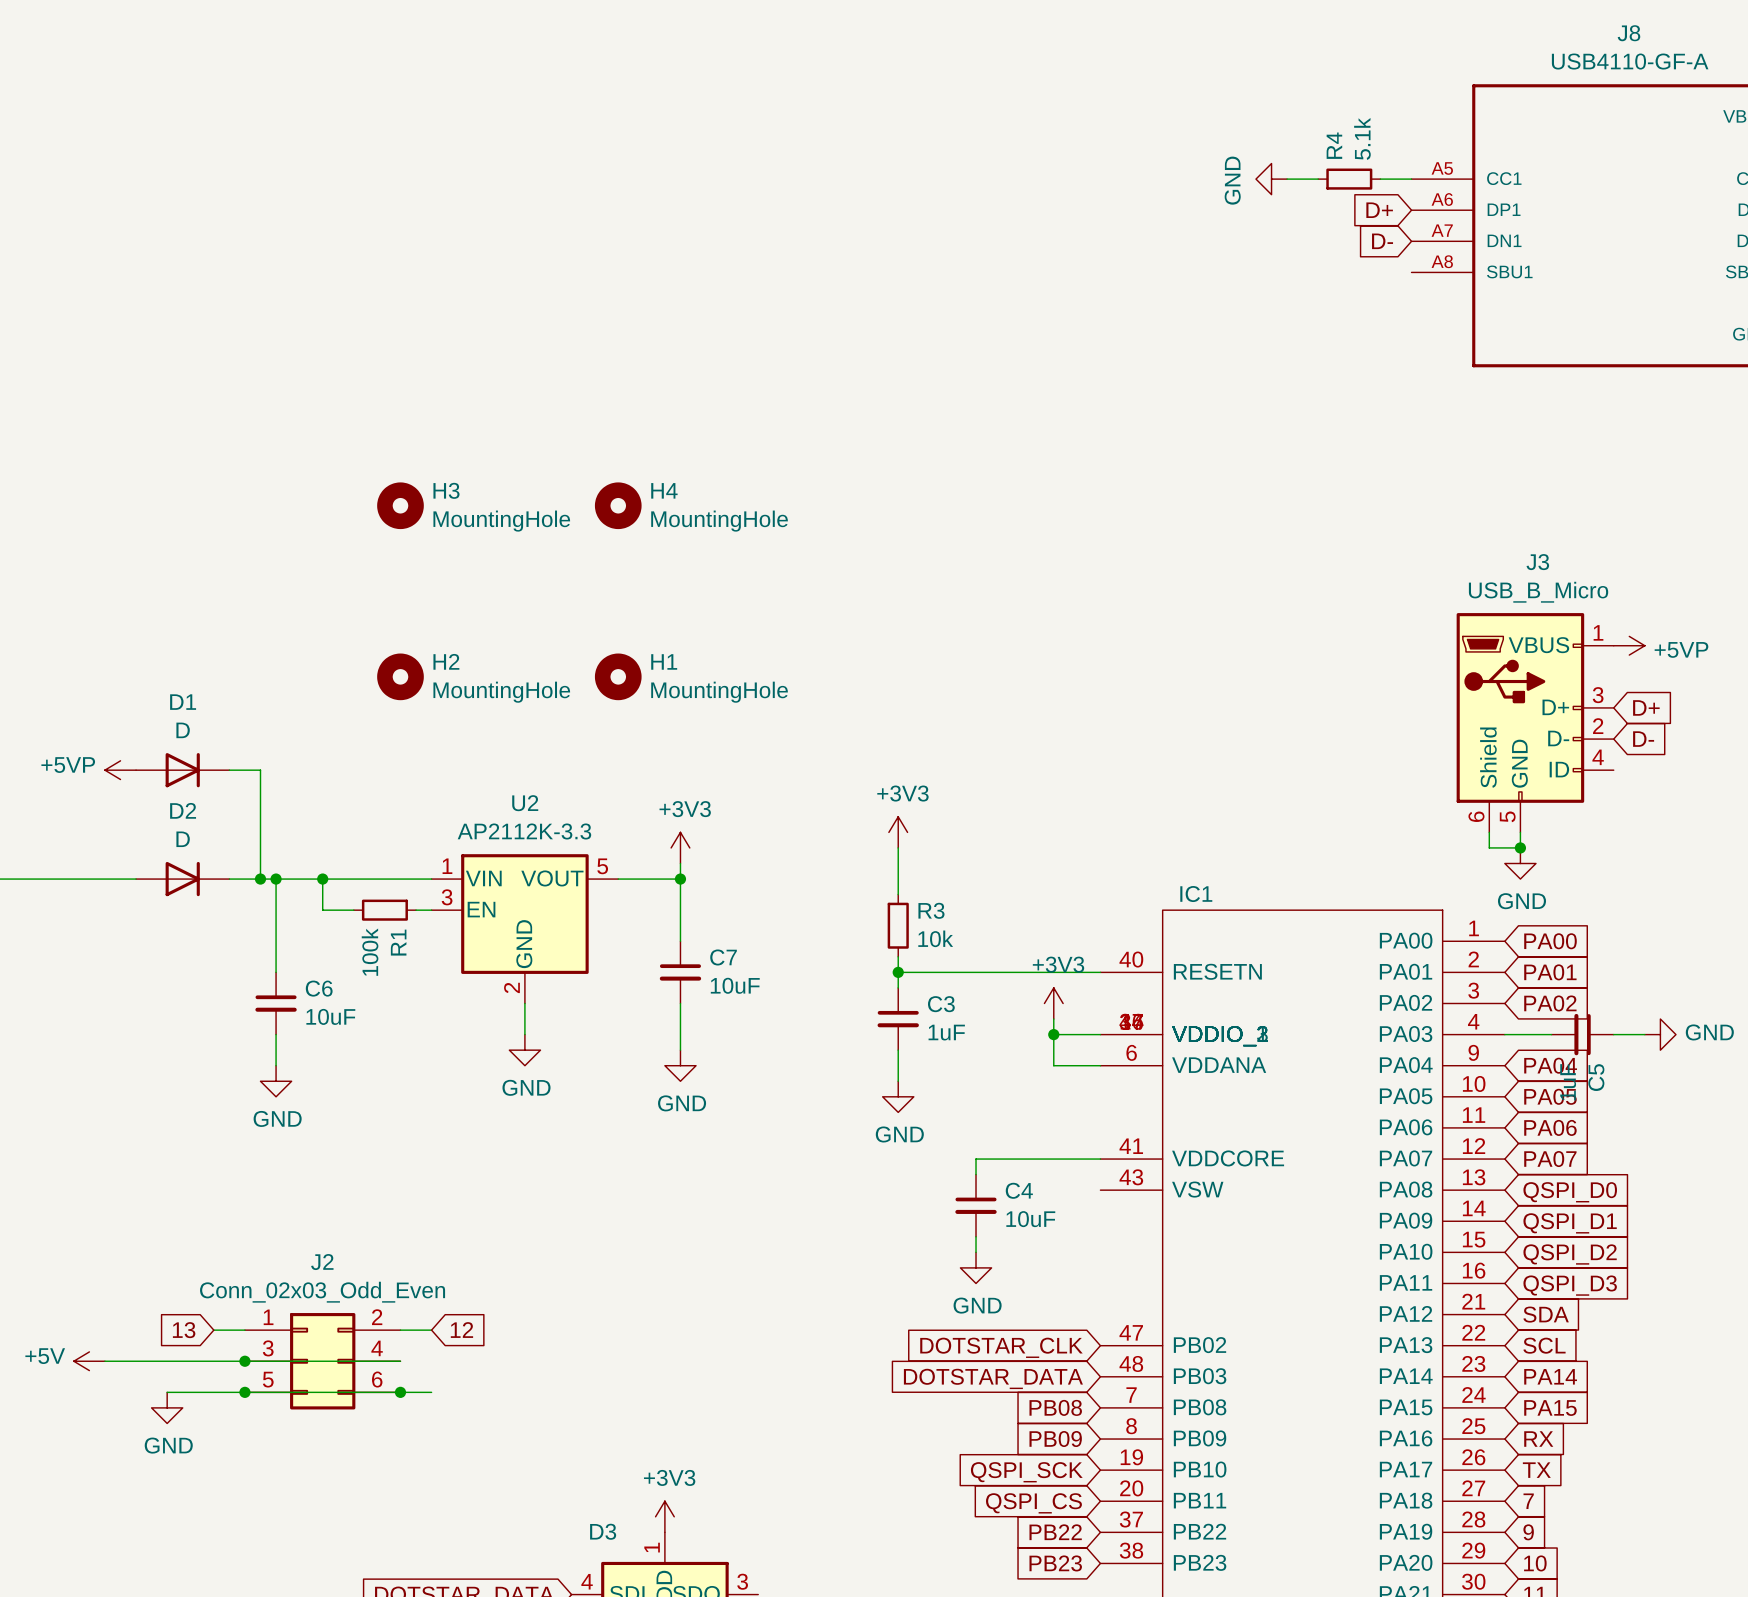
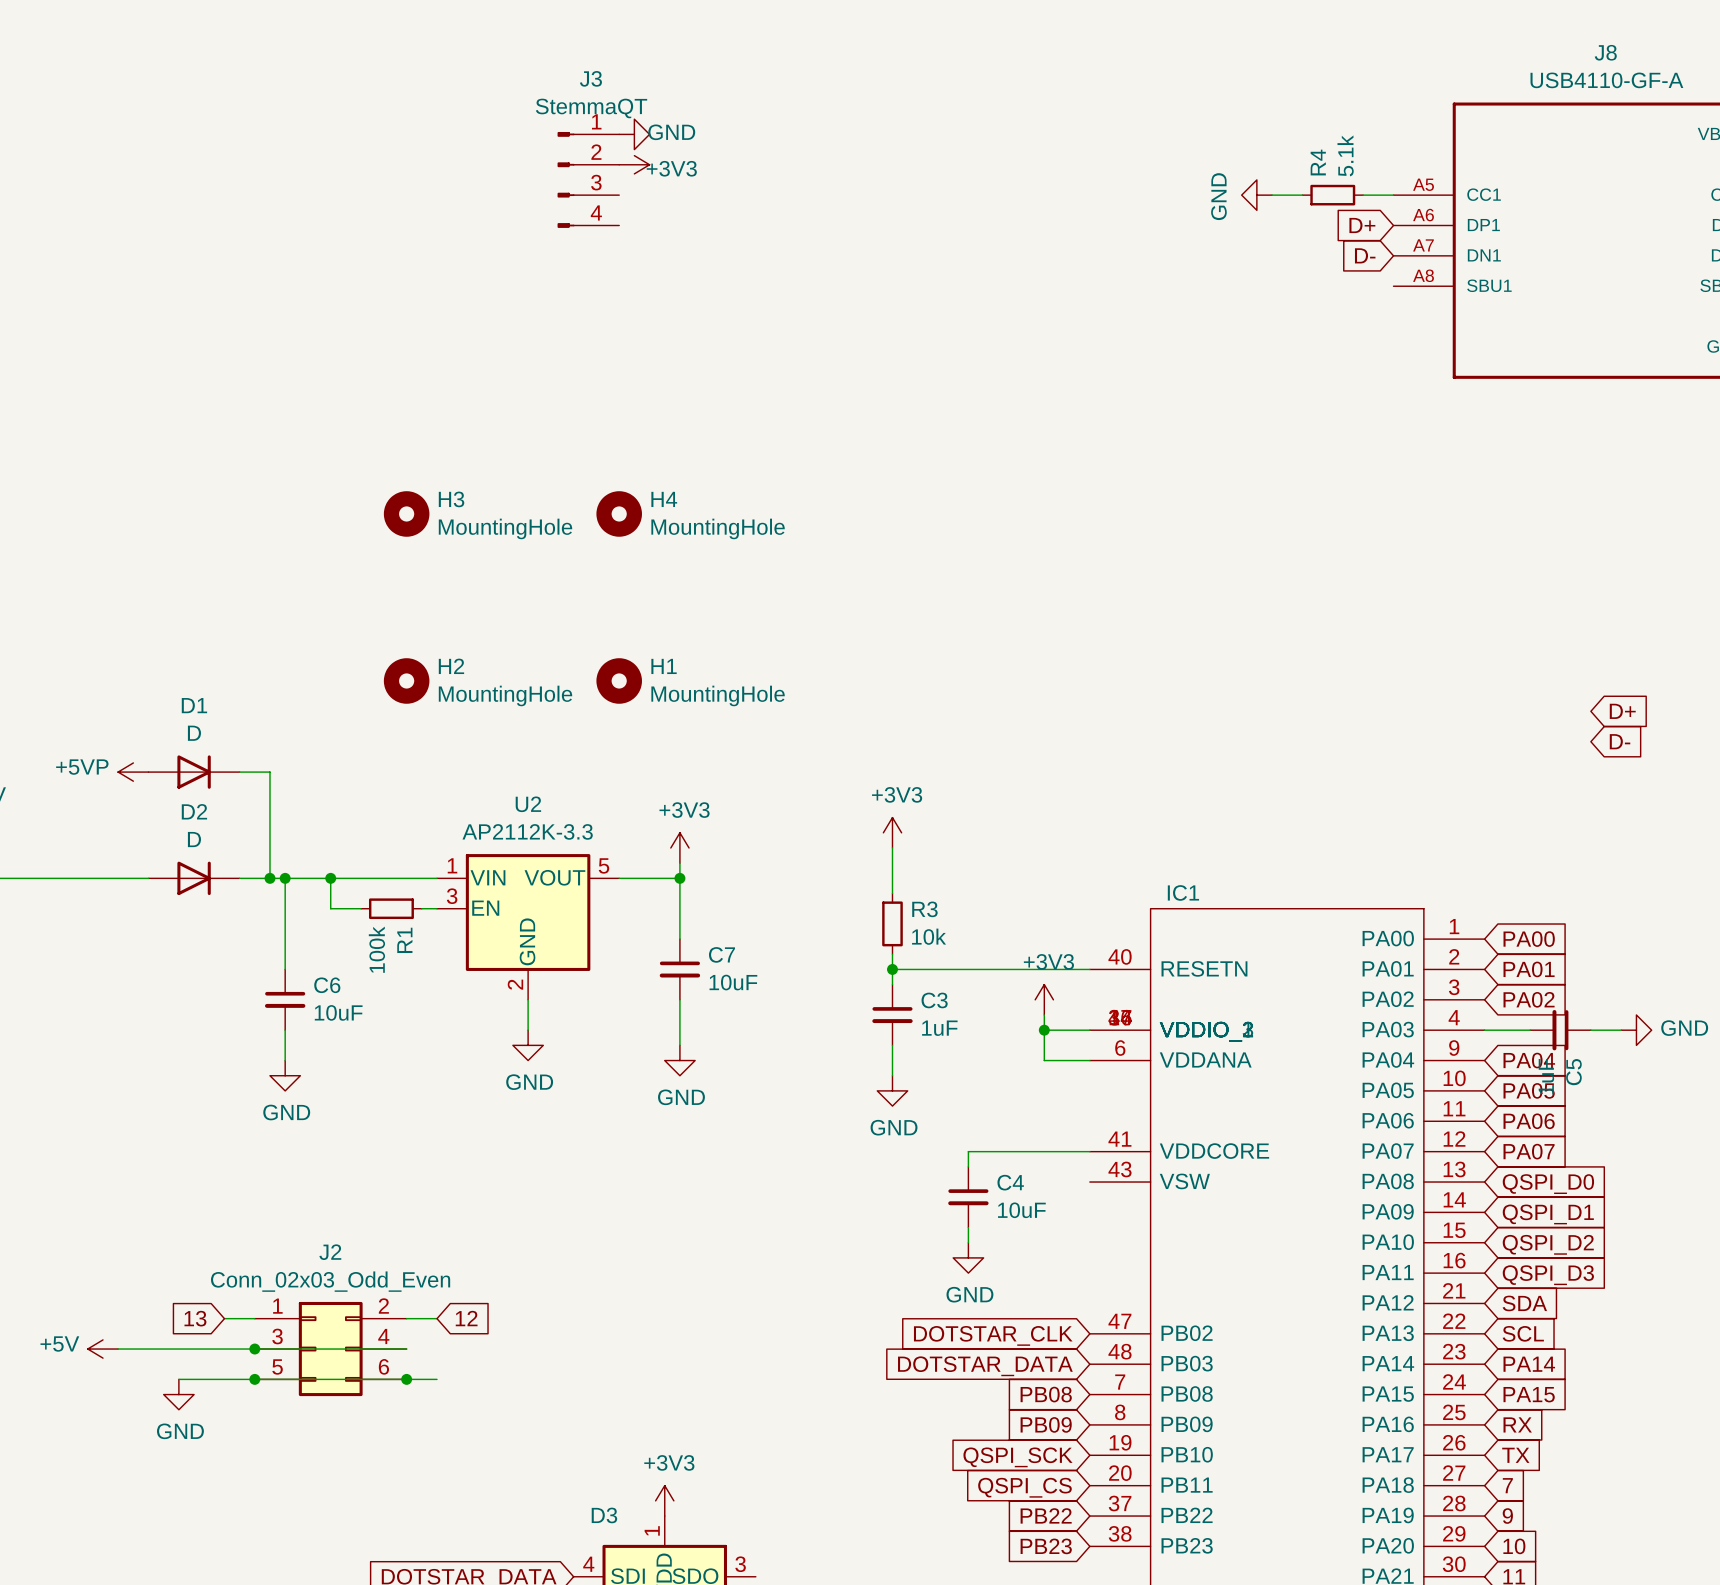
power symbol: none -> GND (634, 134)
power symbol: none -> +3V3 (634, 164)
J3 name position: J3 (1537, 562) -> J3 (590, 78)
J3 value: USB_B_Micro (1538, 592) -> StemmaQT (591, 108)
J3 symbol: [1456, 613, 1614, 833] -> [557, 131, 620, 228]
power symbol: +5VP (1629, 645) -> none
wire: (1489, 832) (1489, 847) (1520, 847) (1520, 832) -> none
junction: (1520, 847) -> none
power symbol: GND (1520, 863) -> none

